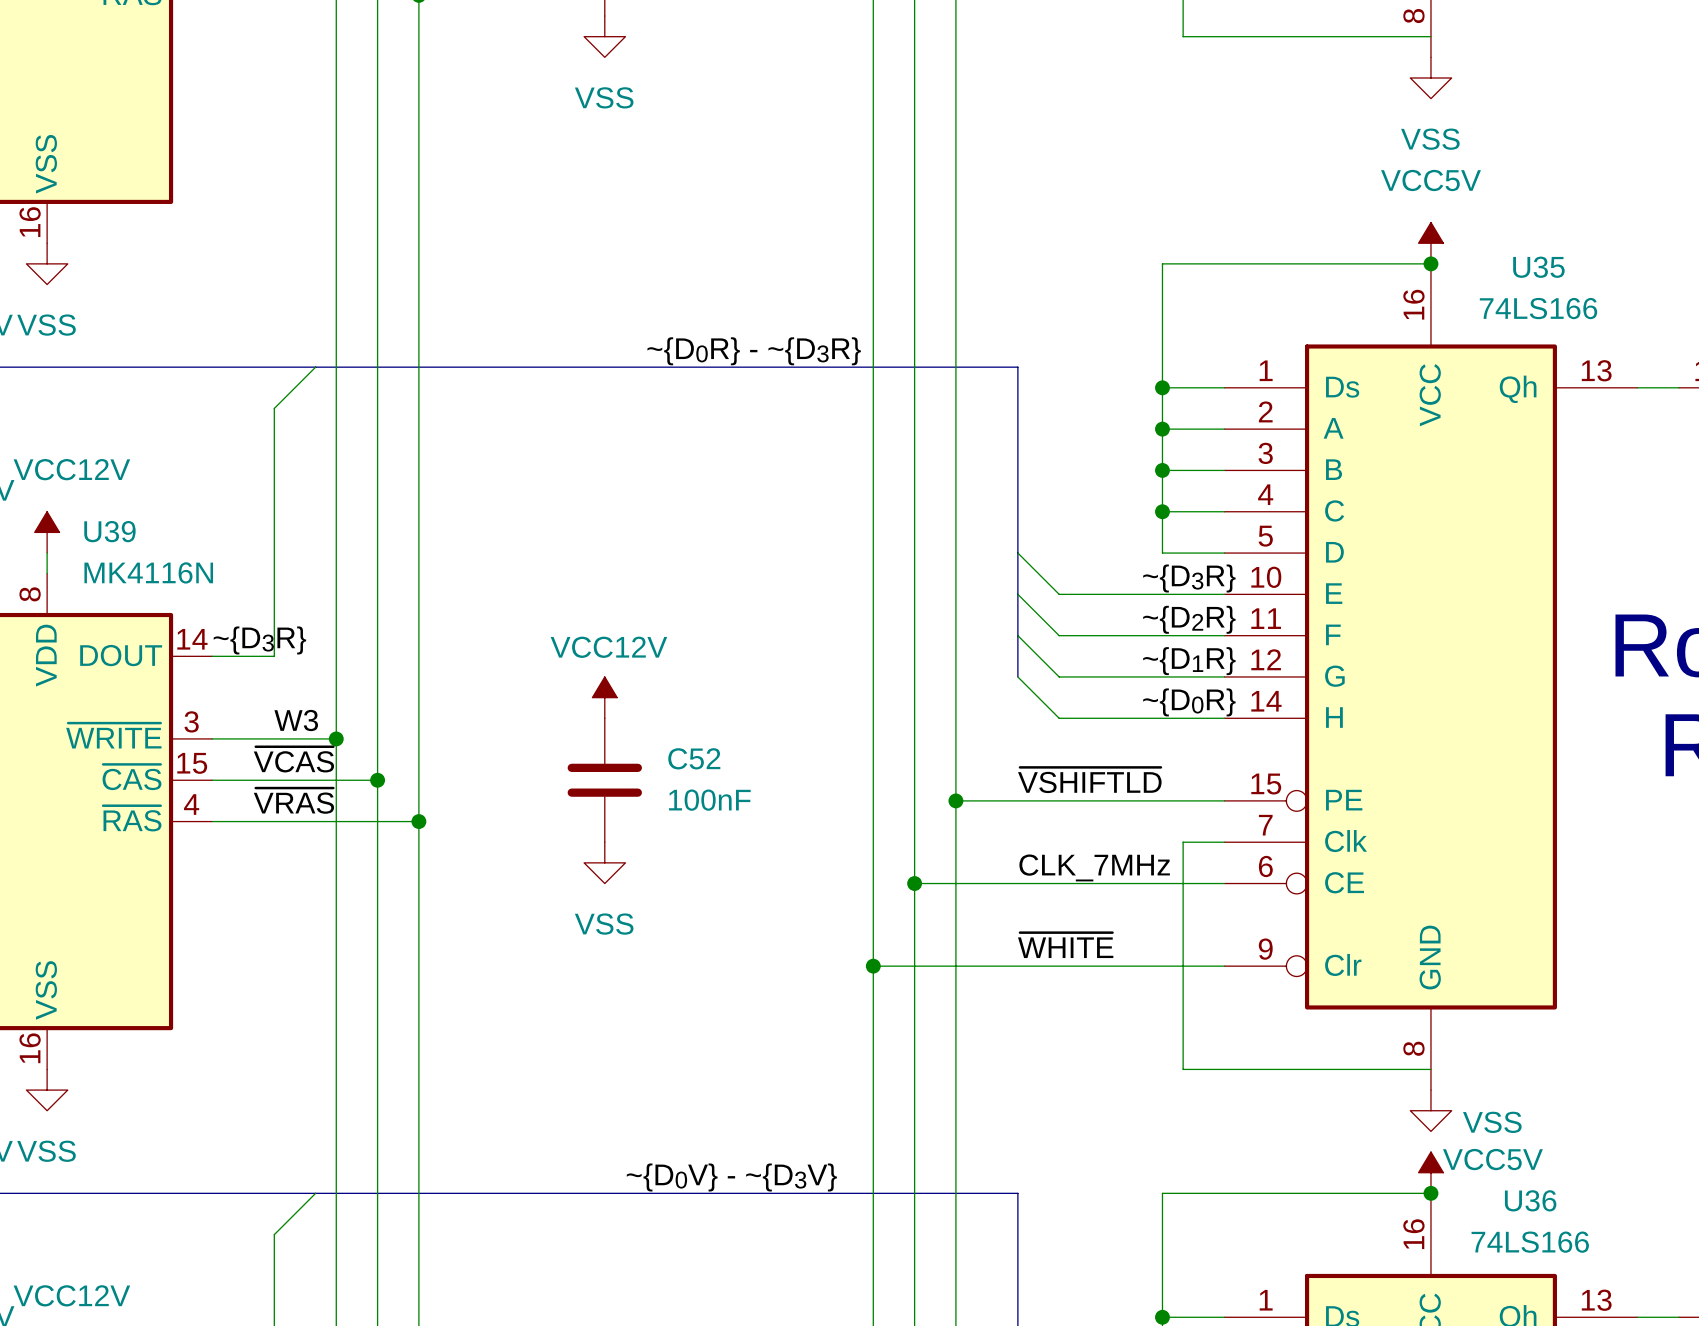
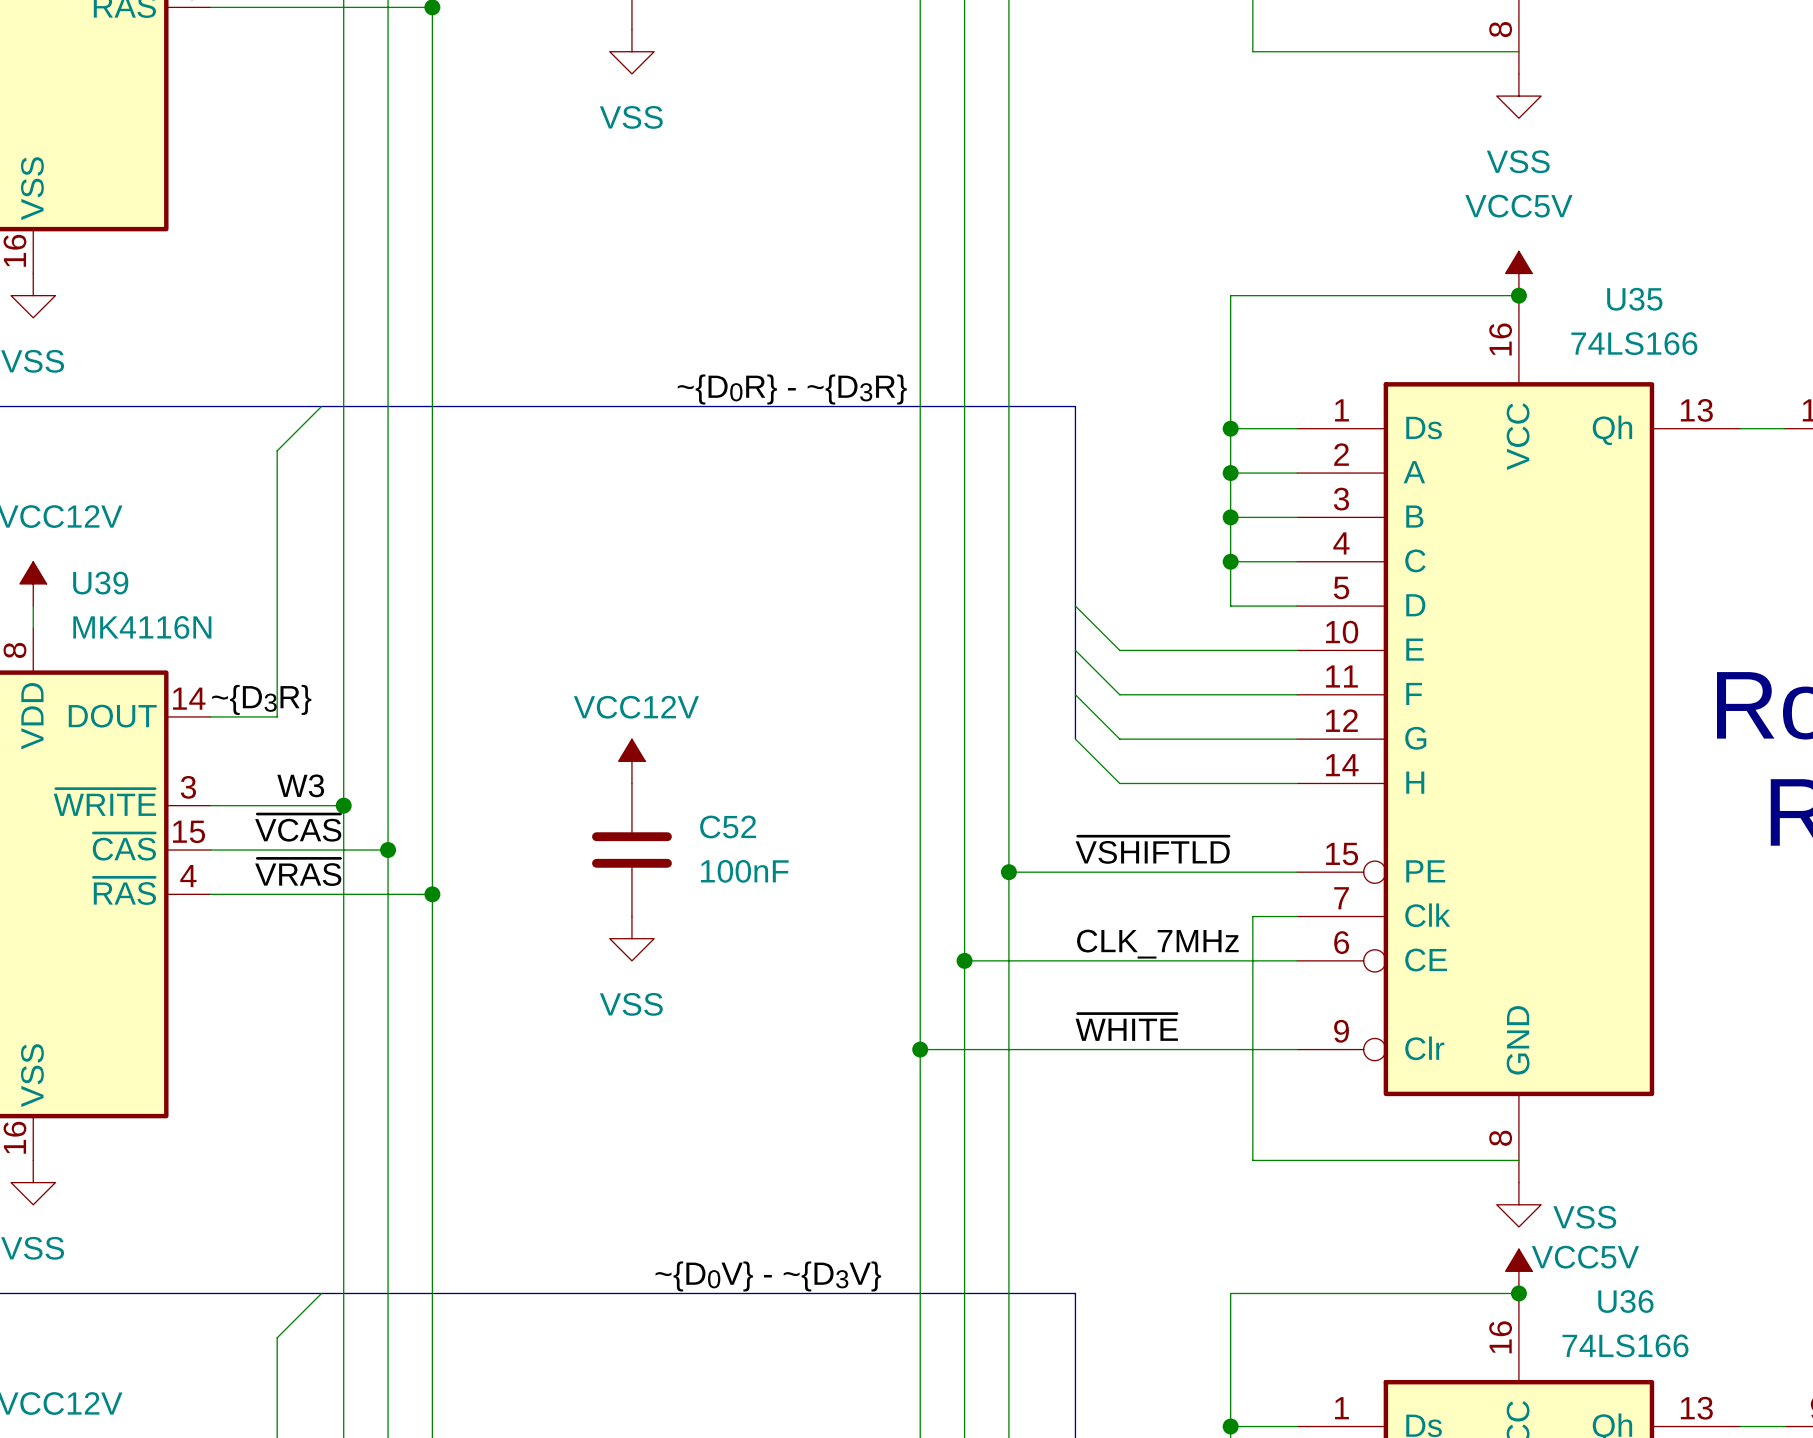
label: ~{D3R} (1189, 578) -> none
label: ~{D2R} (1189, 619) -> none
label: ~{D1R} (1189, 661) -> none
label: ~{D0R} (1189, 702) -> none

